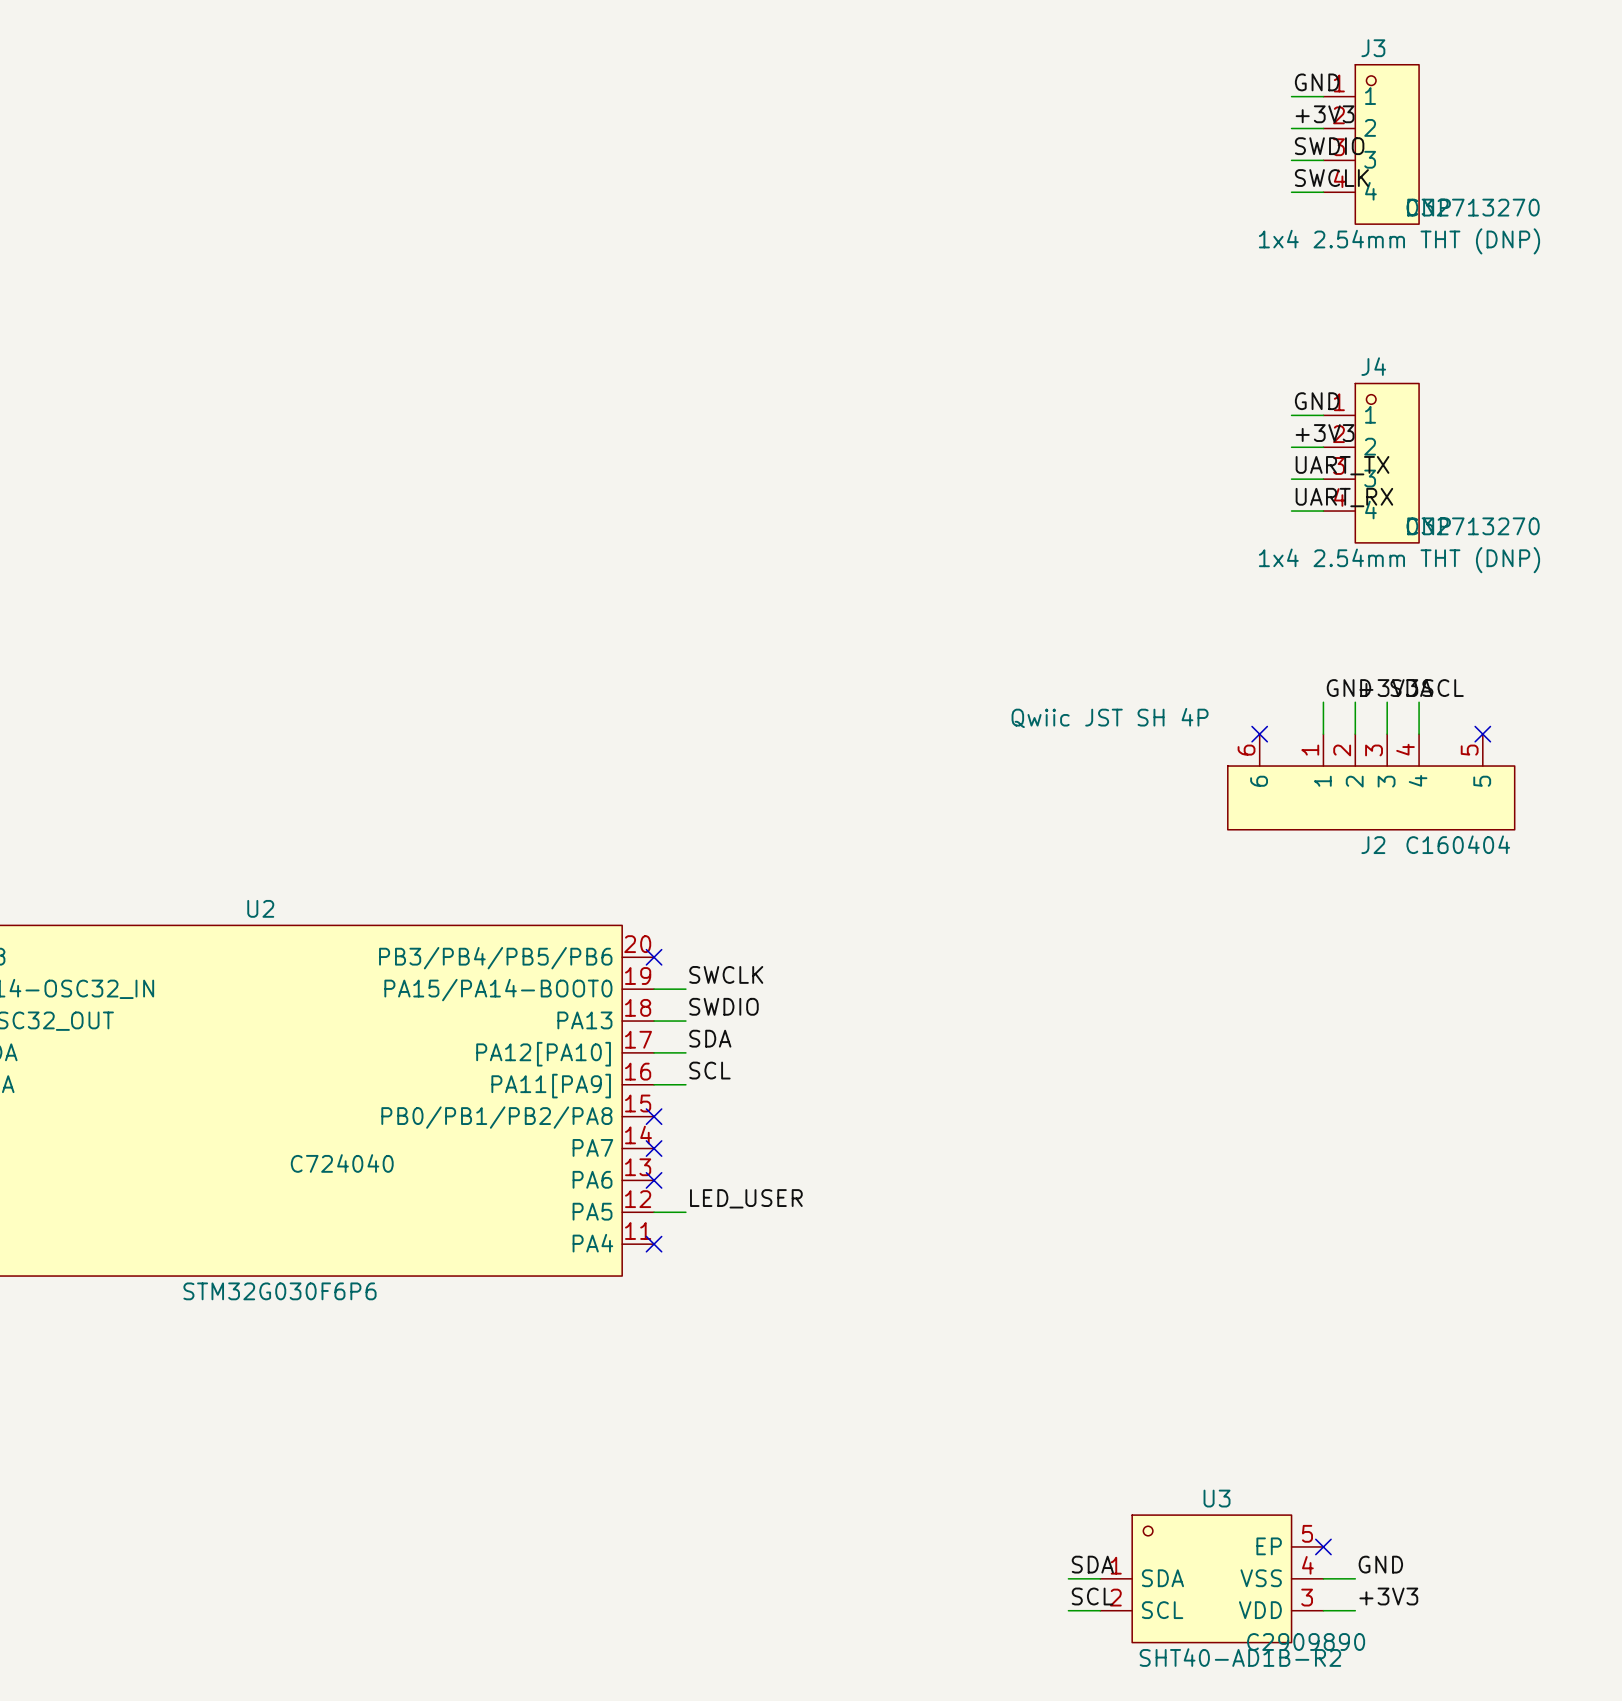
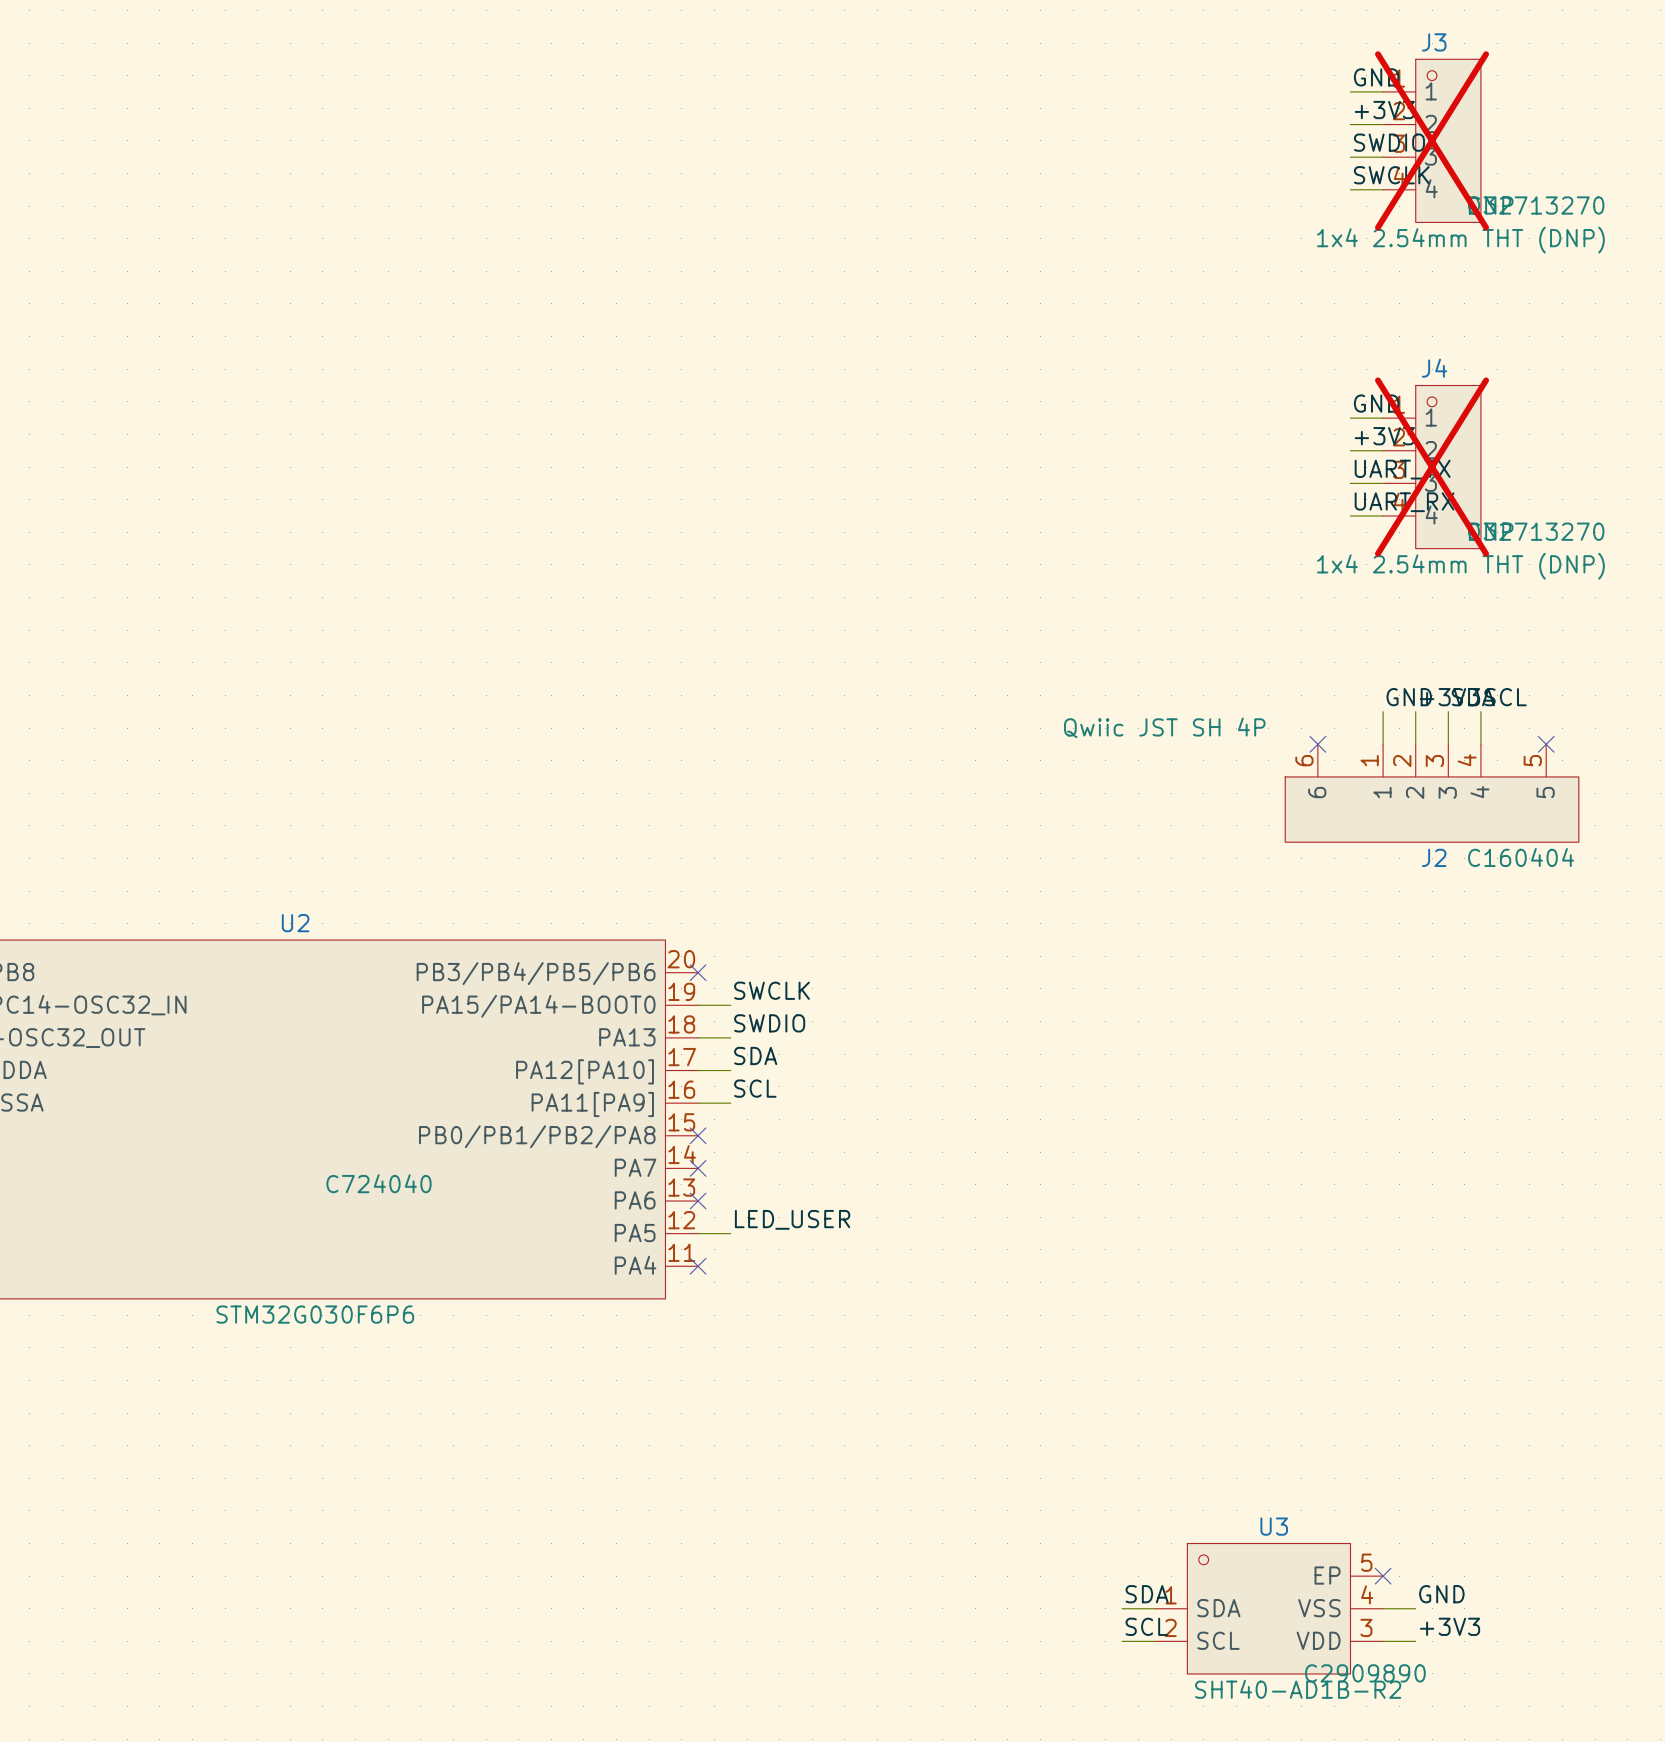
J3 do-not-place cross: none -> (1432, 140)
J4 do-not-place cross: none -> (1432, 467)

